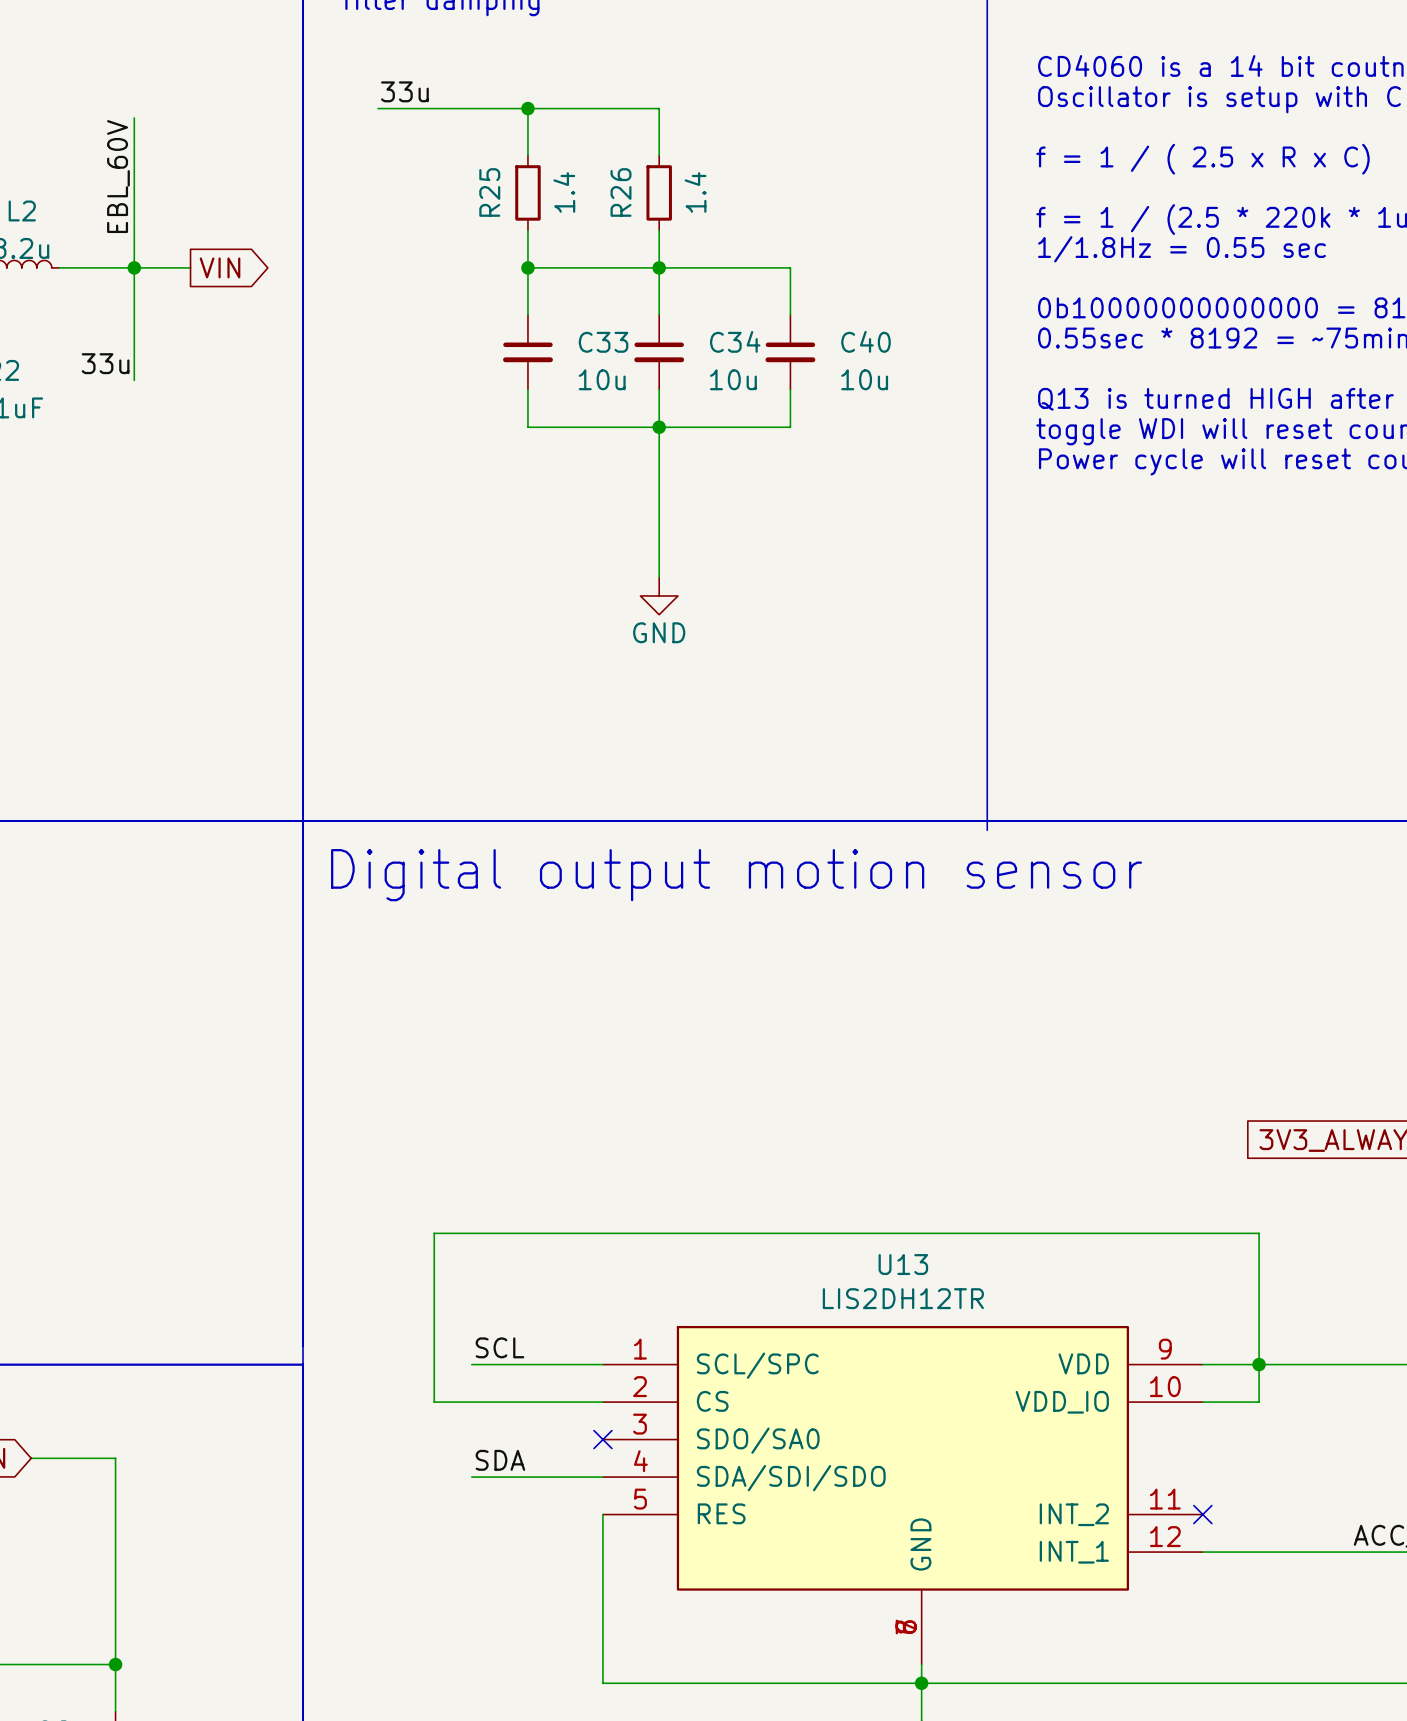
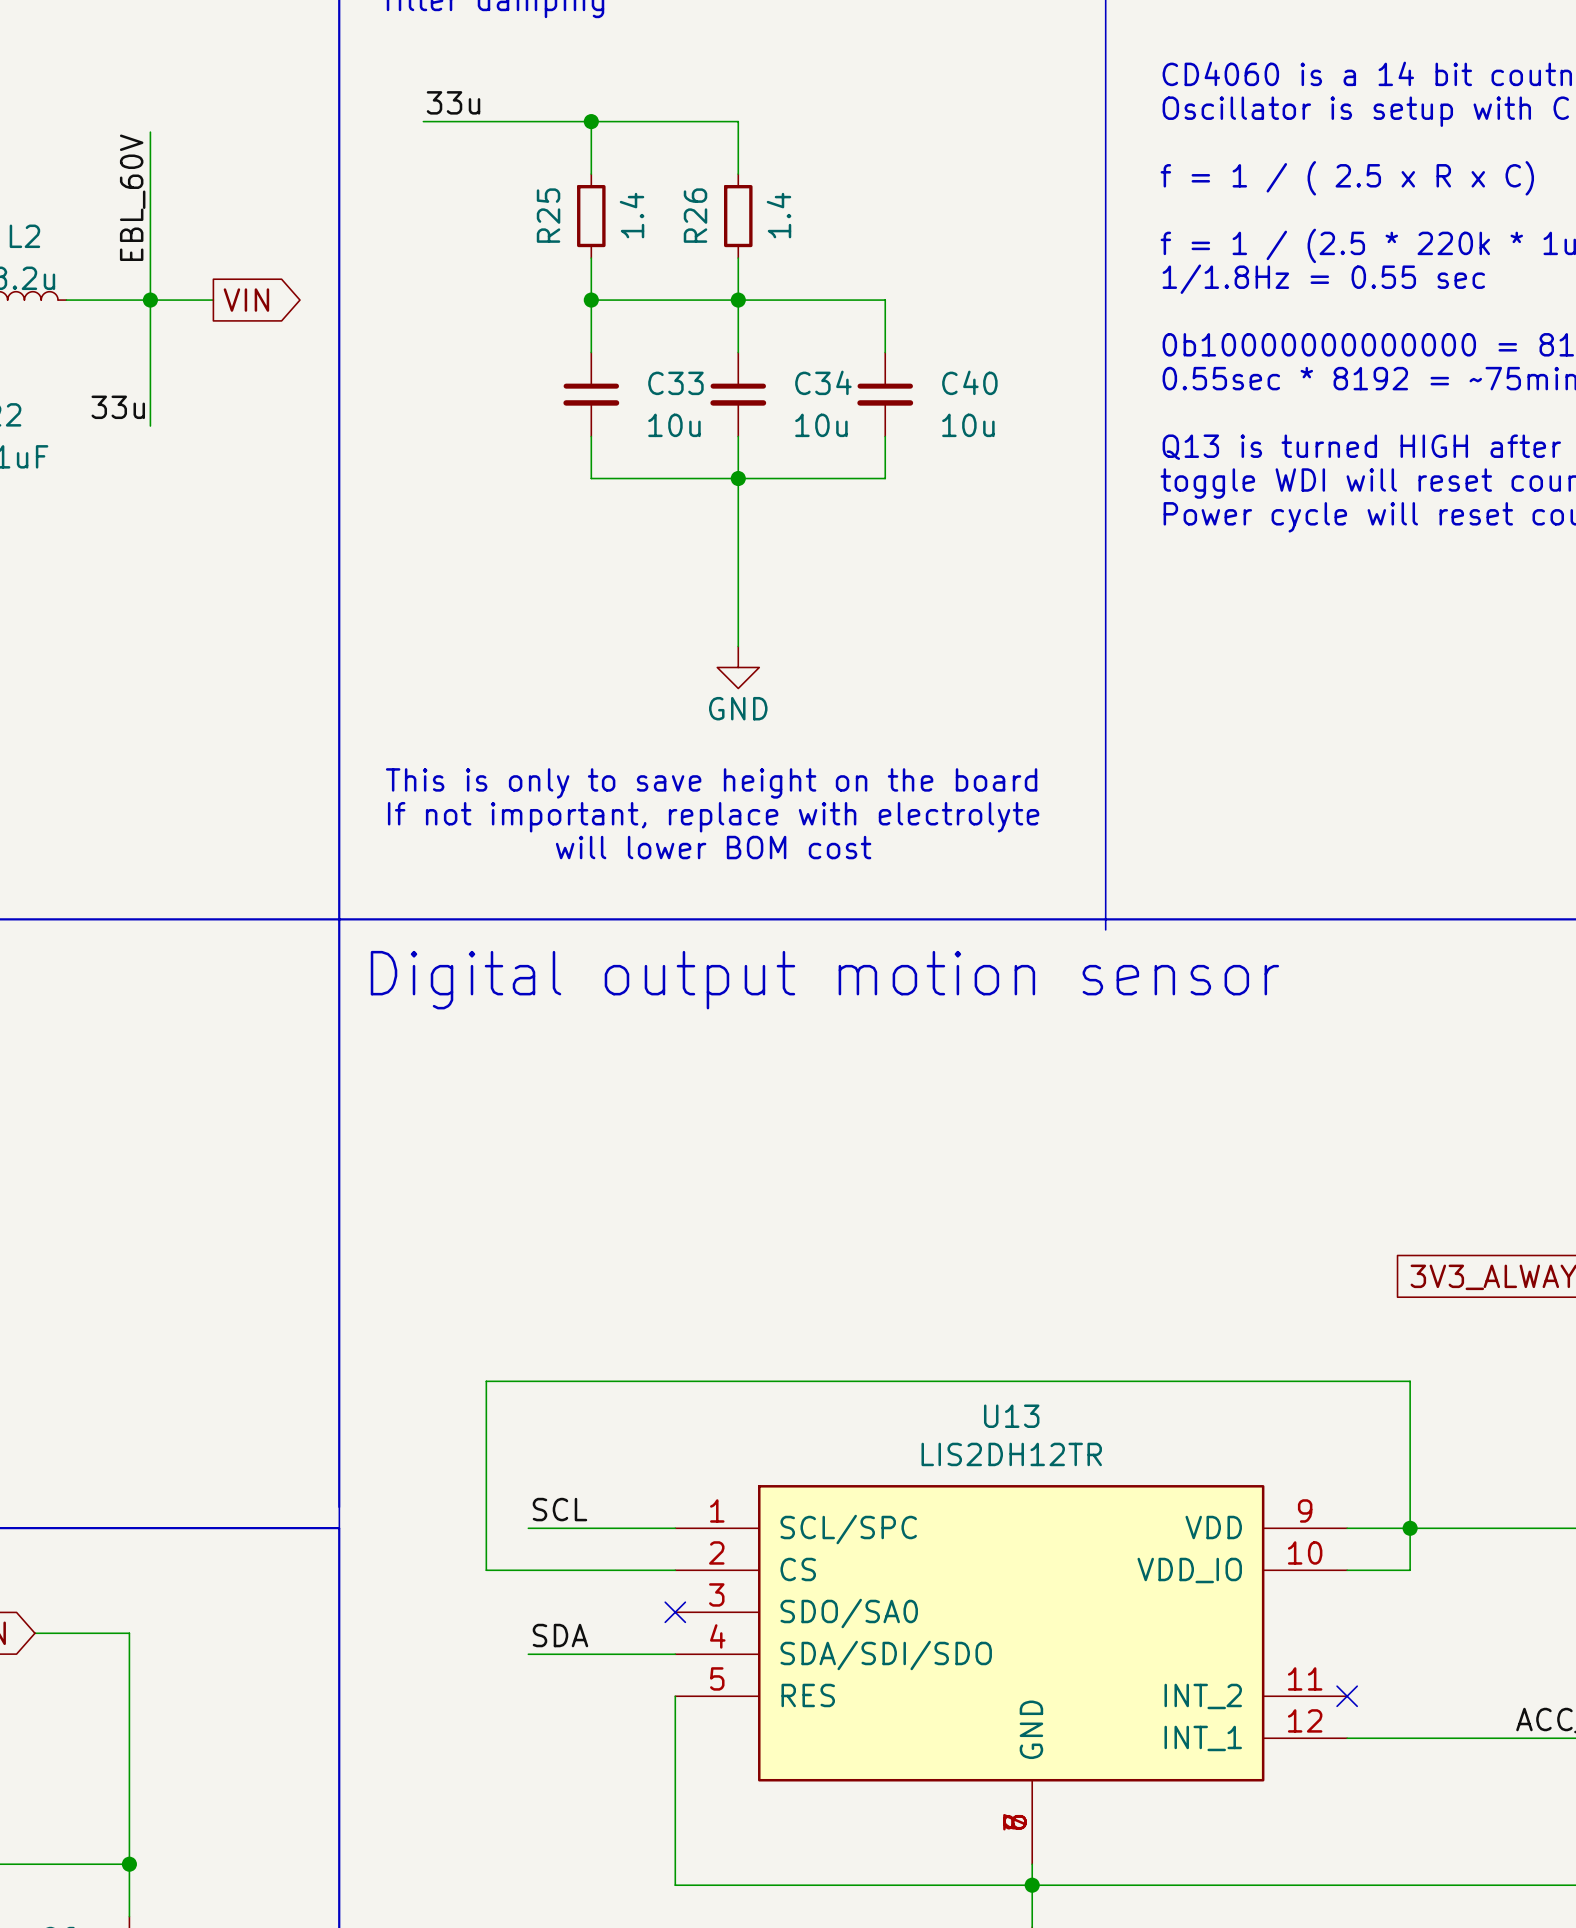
text: none -> This is only to save height on the board (711, 783)
text: none -> If not important, replace with electrolyte (713, 817)
text: none -> will lower BOM cost (713, 847)

